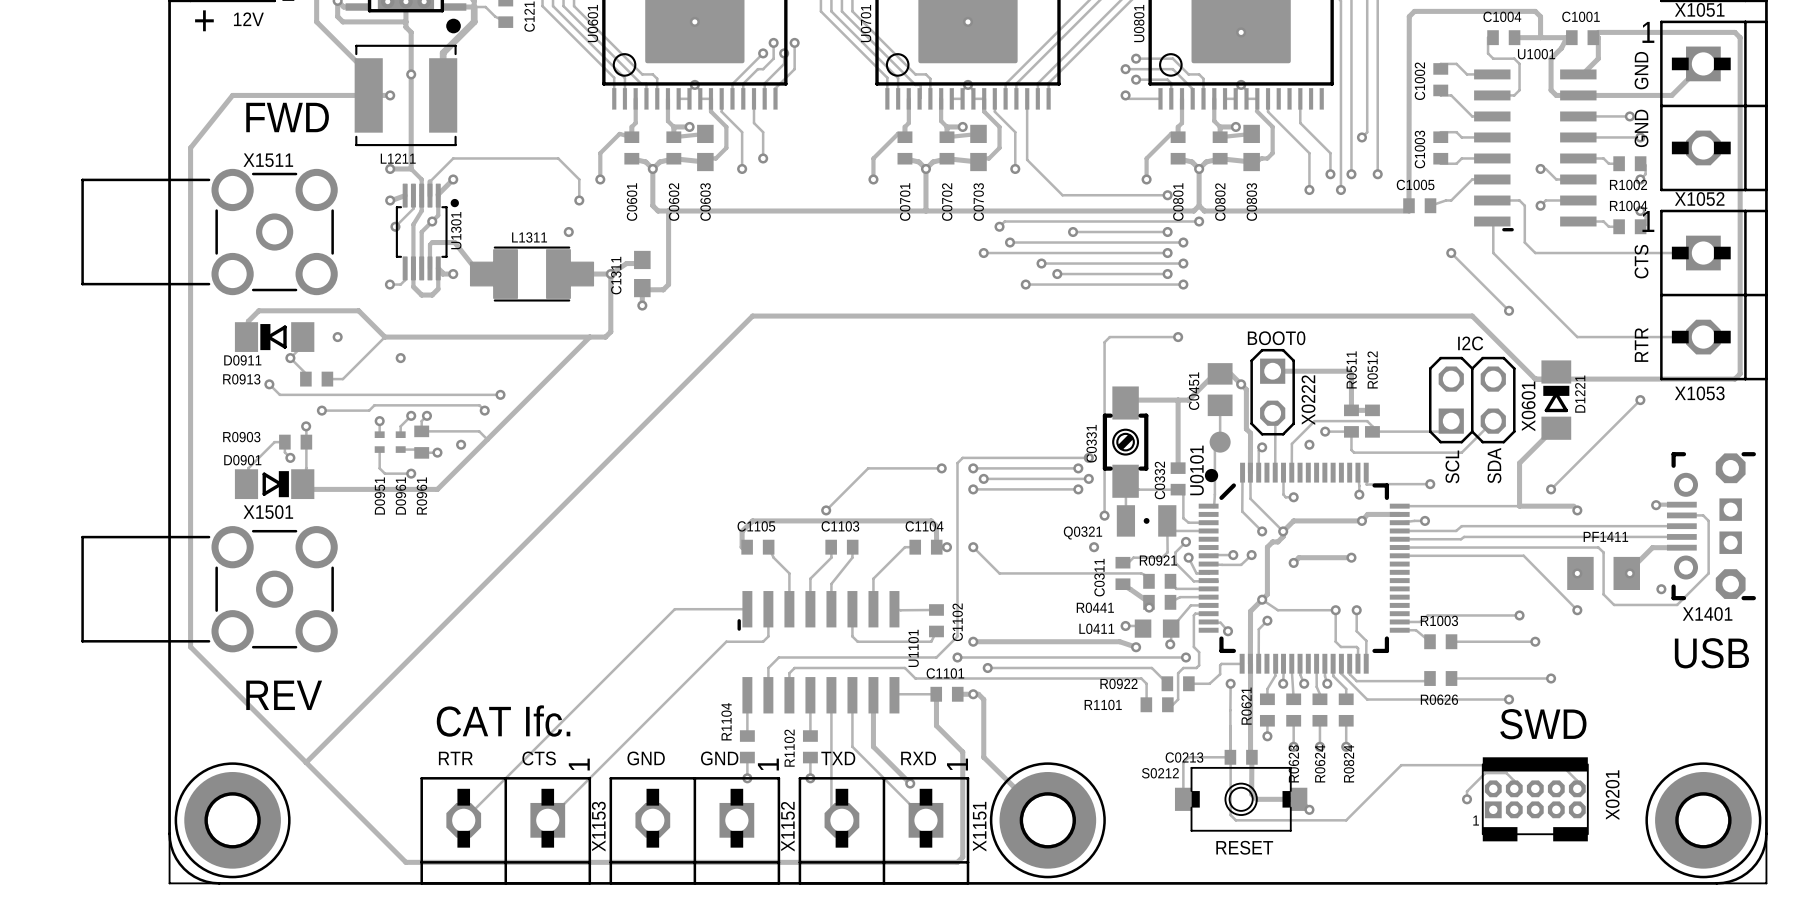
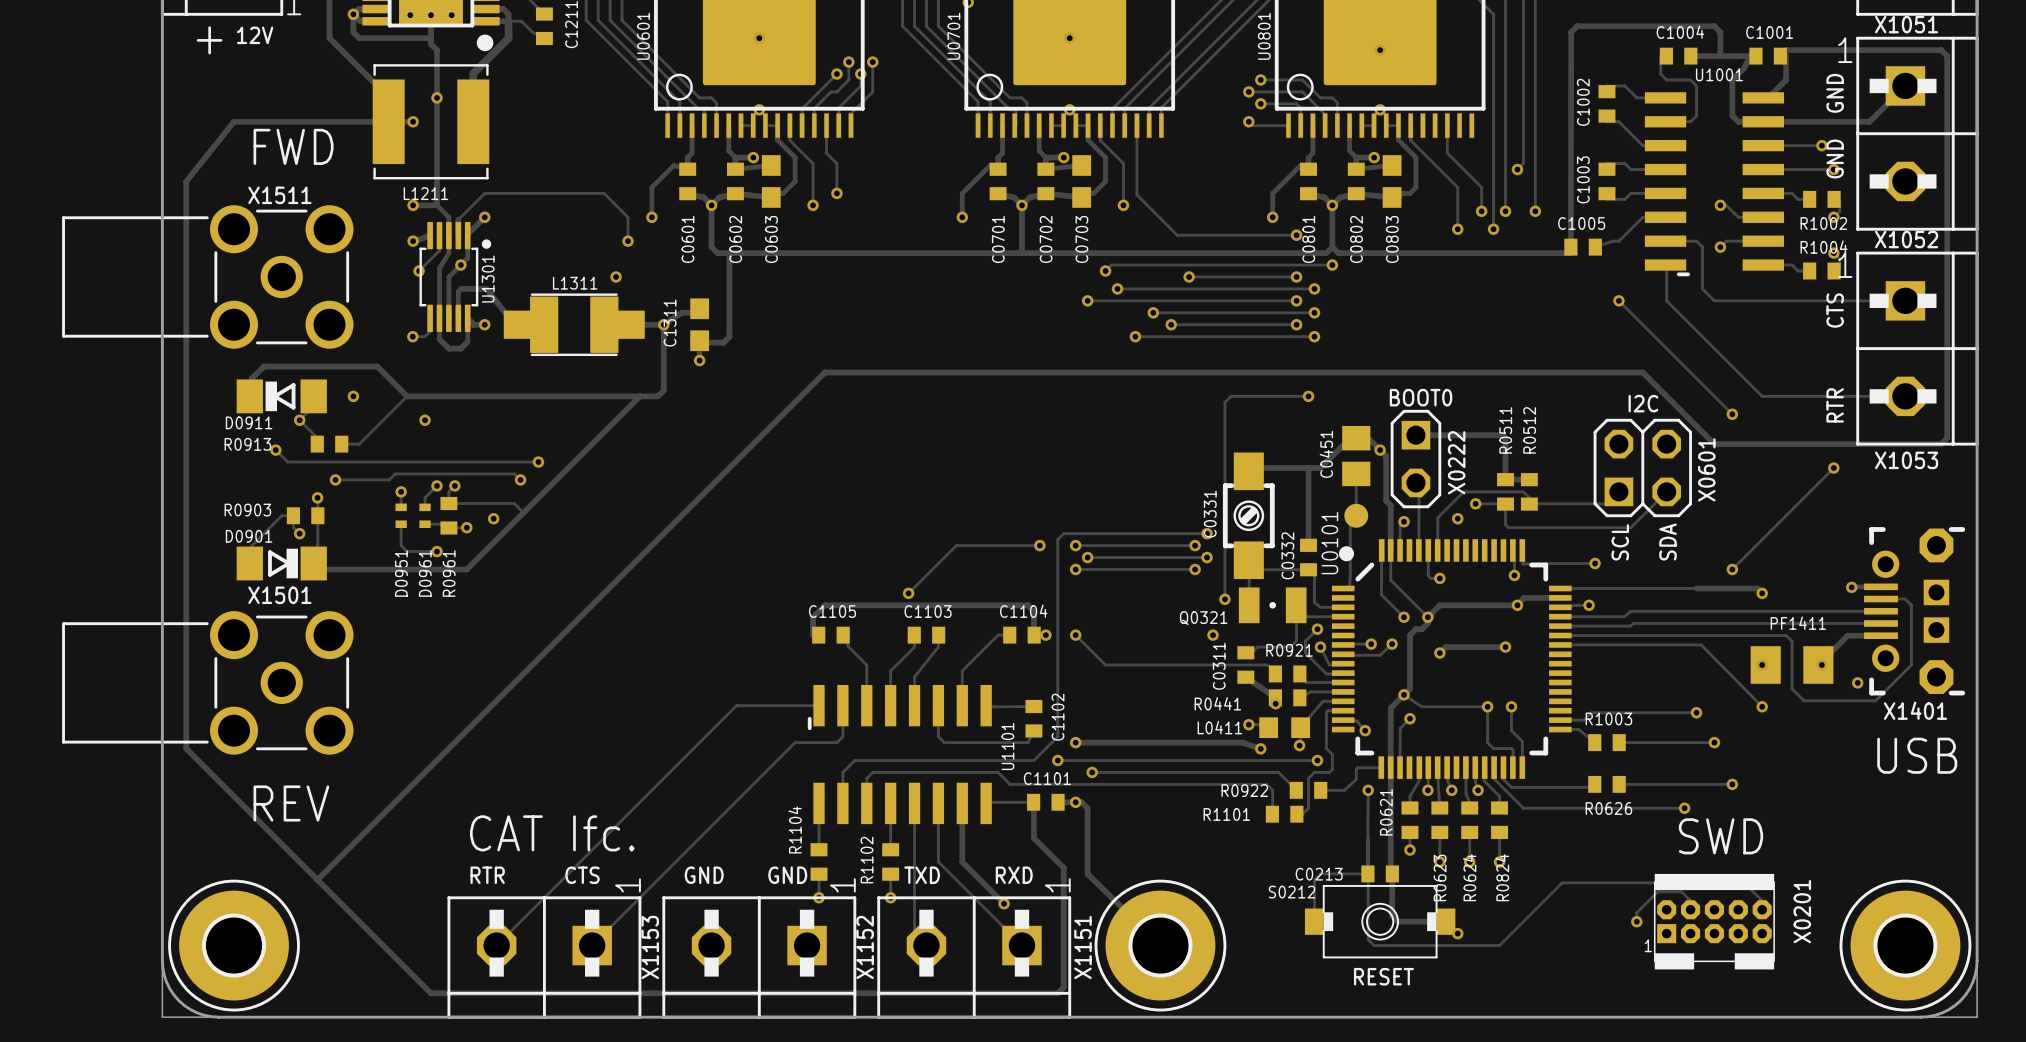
track: none -> (1684, 366) (1732, 414)
via position: (1509, 310) -> (1732, 414)
D1221: (1556, 400) -> none
track: (1556, 428) (1519, 463) (1519, 506) -> none

